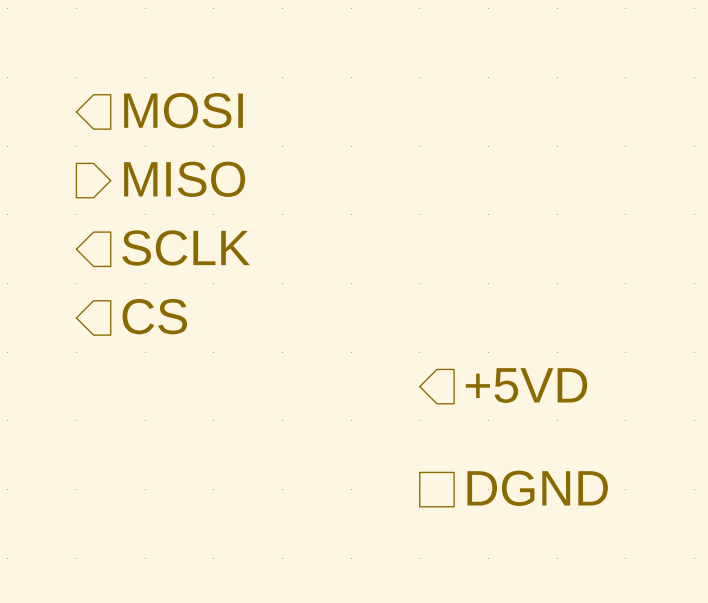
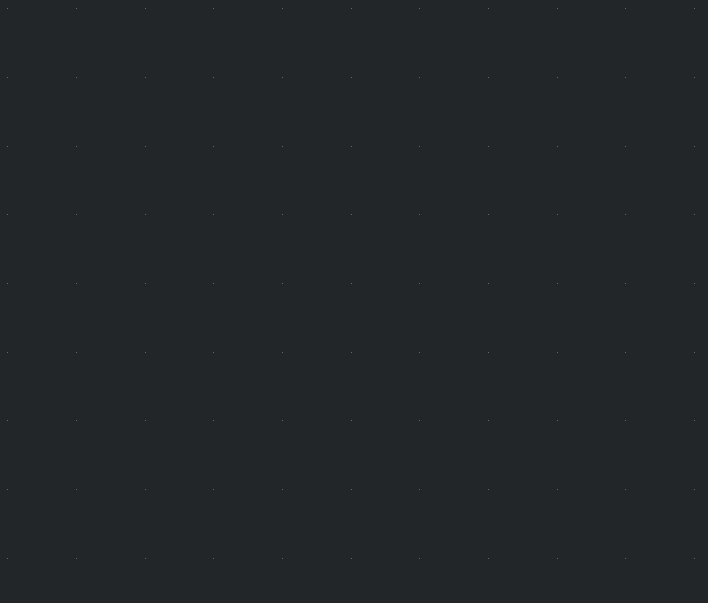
hierarchical label: MOSI (183, 110) -> none
hierarchical label: MISO (184, 179) -> none
hierarchical label: SCLK (186, 247) -> none
hierarchical label: CS (154, 316) -> none
hierarchical label: +5VD (526, 385) -> none
hierarchical label: DGND (537, 488) -> none

